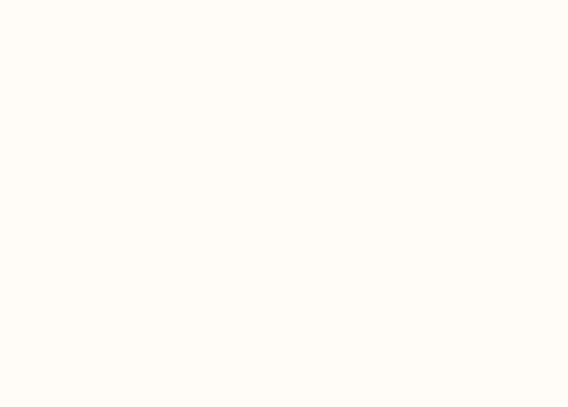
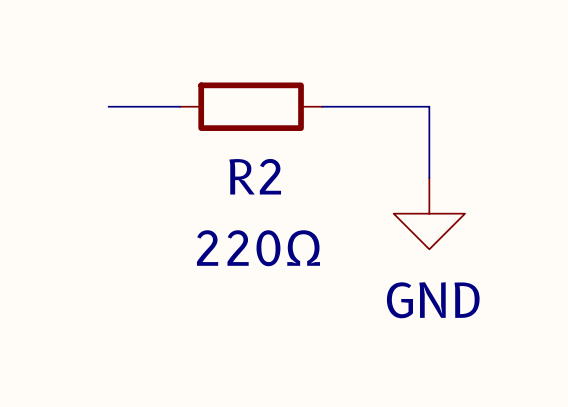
wire: none -> (108, 106) (179, 106)
R2: none -> 220Ω (251, 106)
wire: none -> (322, 106) (429, 106) (429, 178)
power symbol: none -> GND (429, 213)

